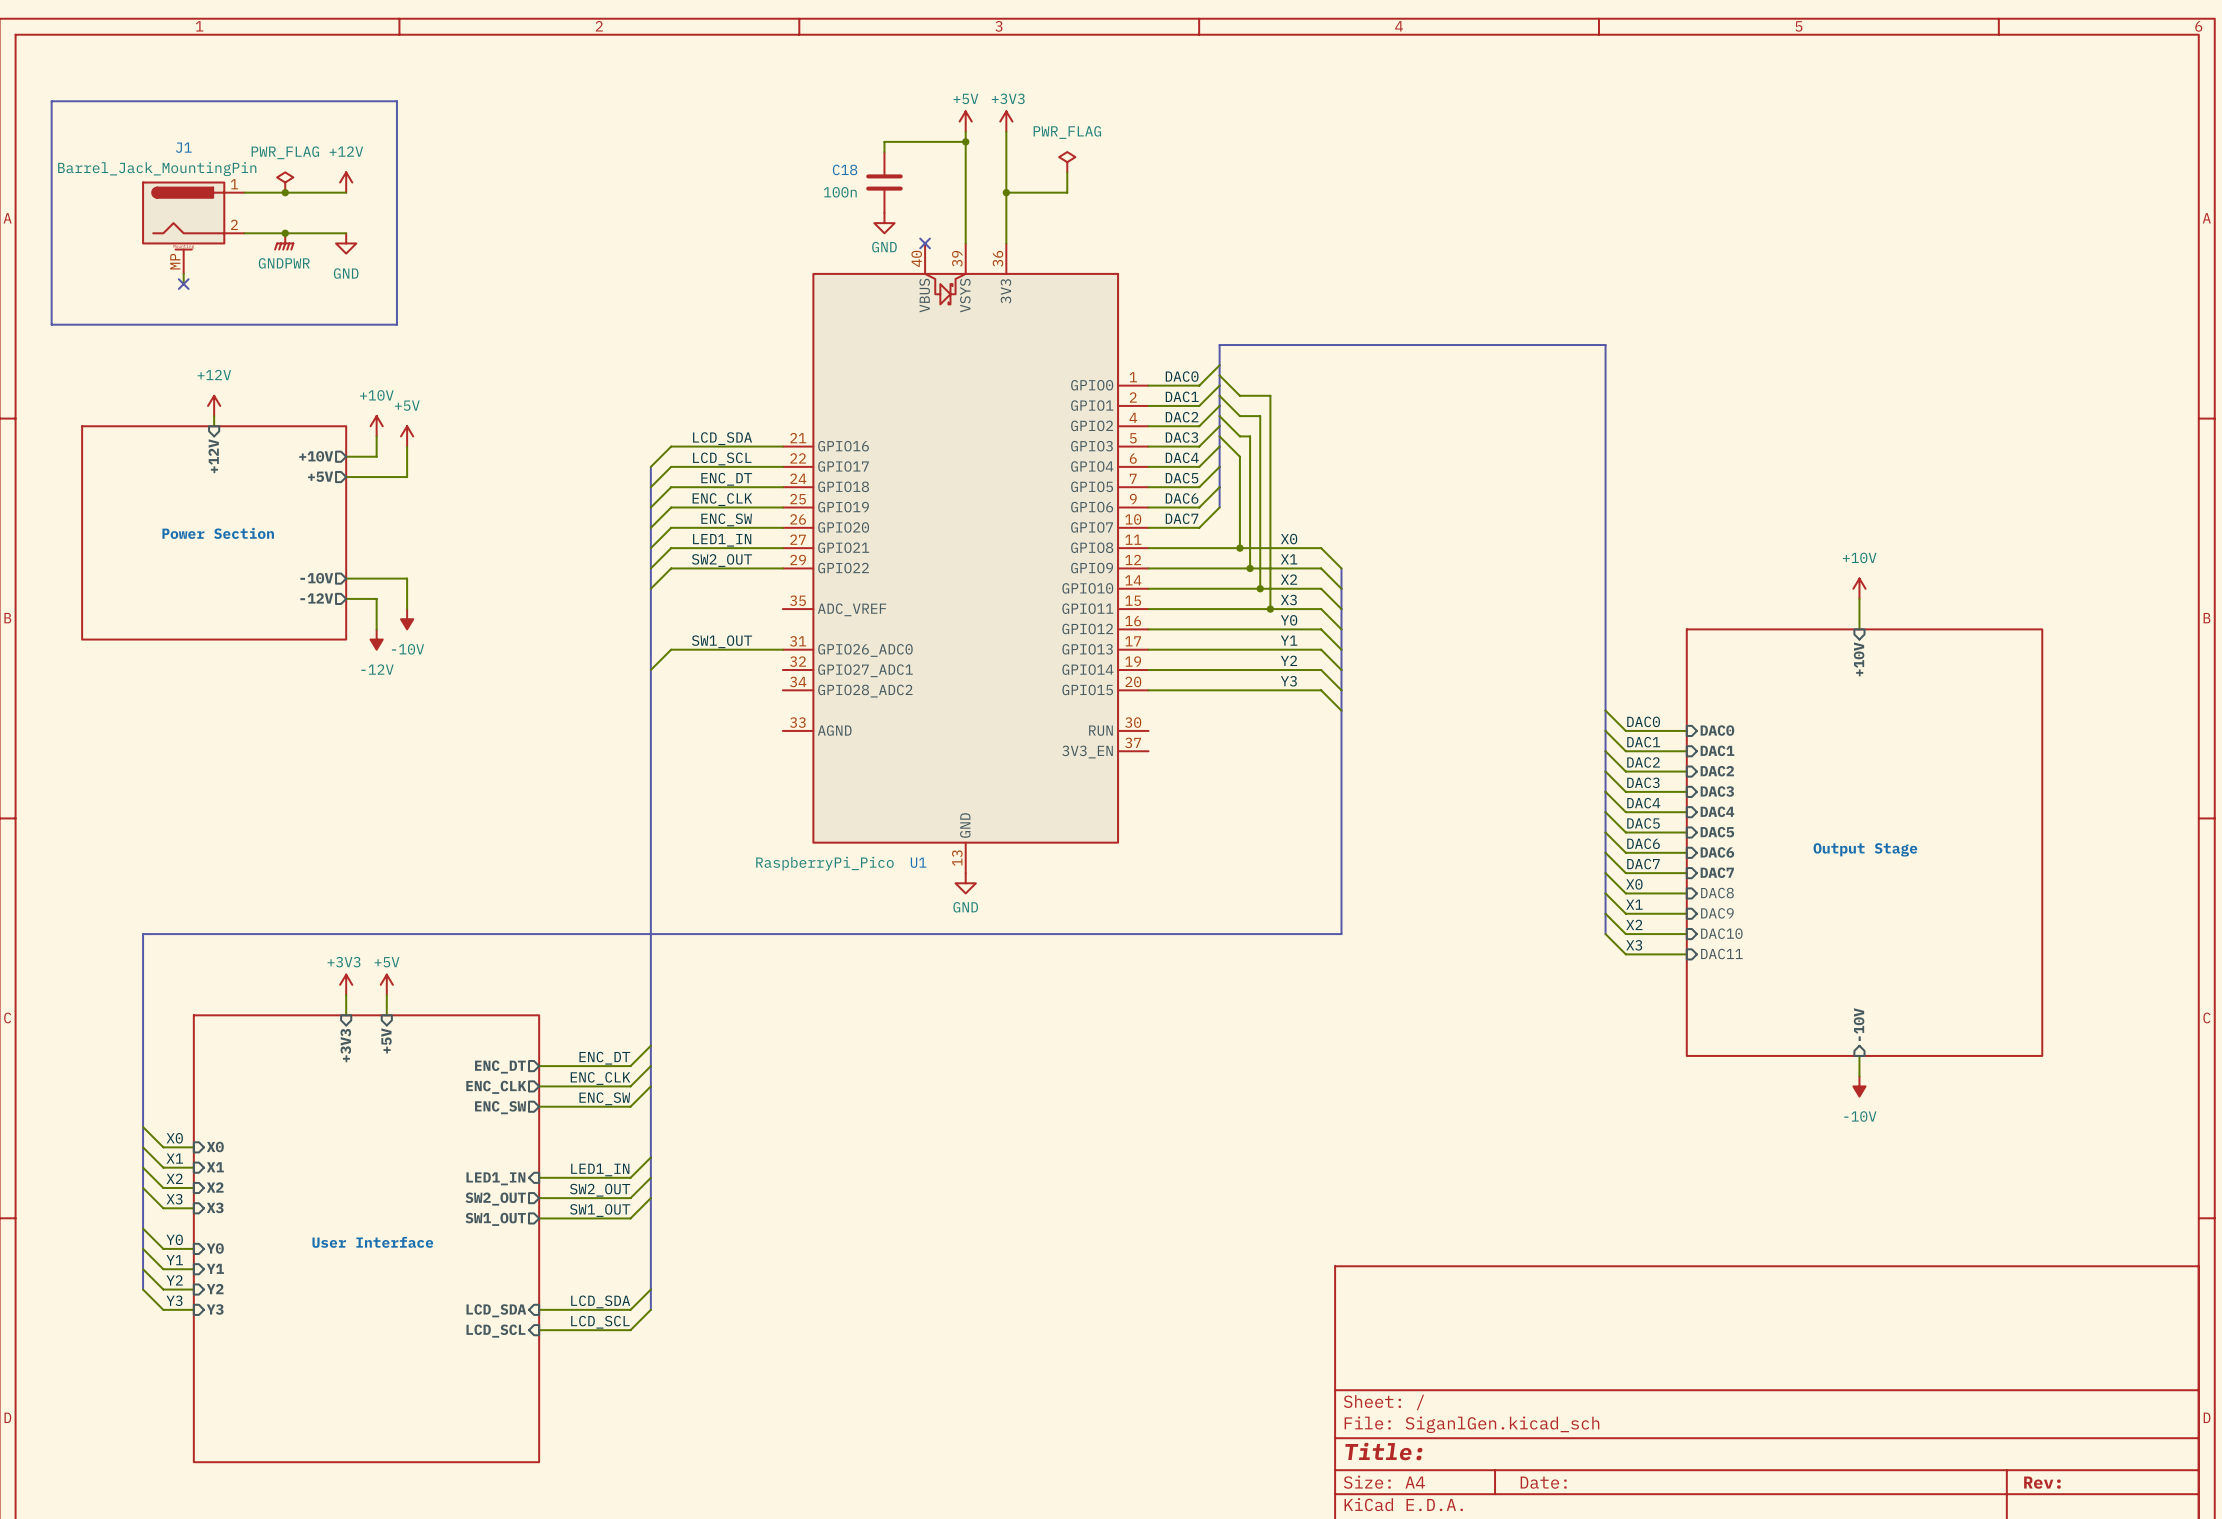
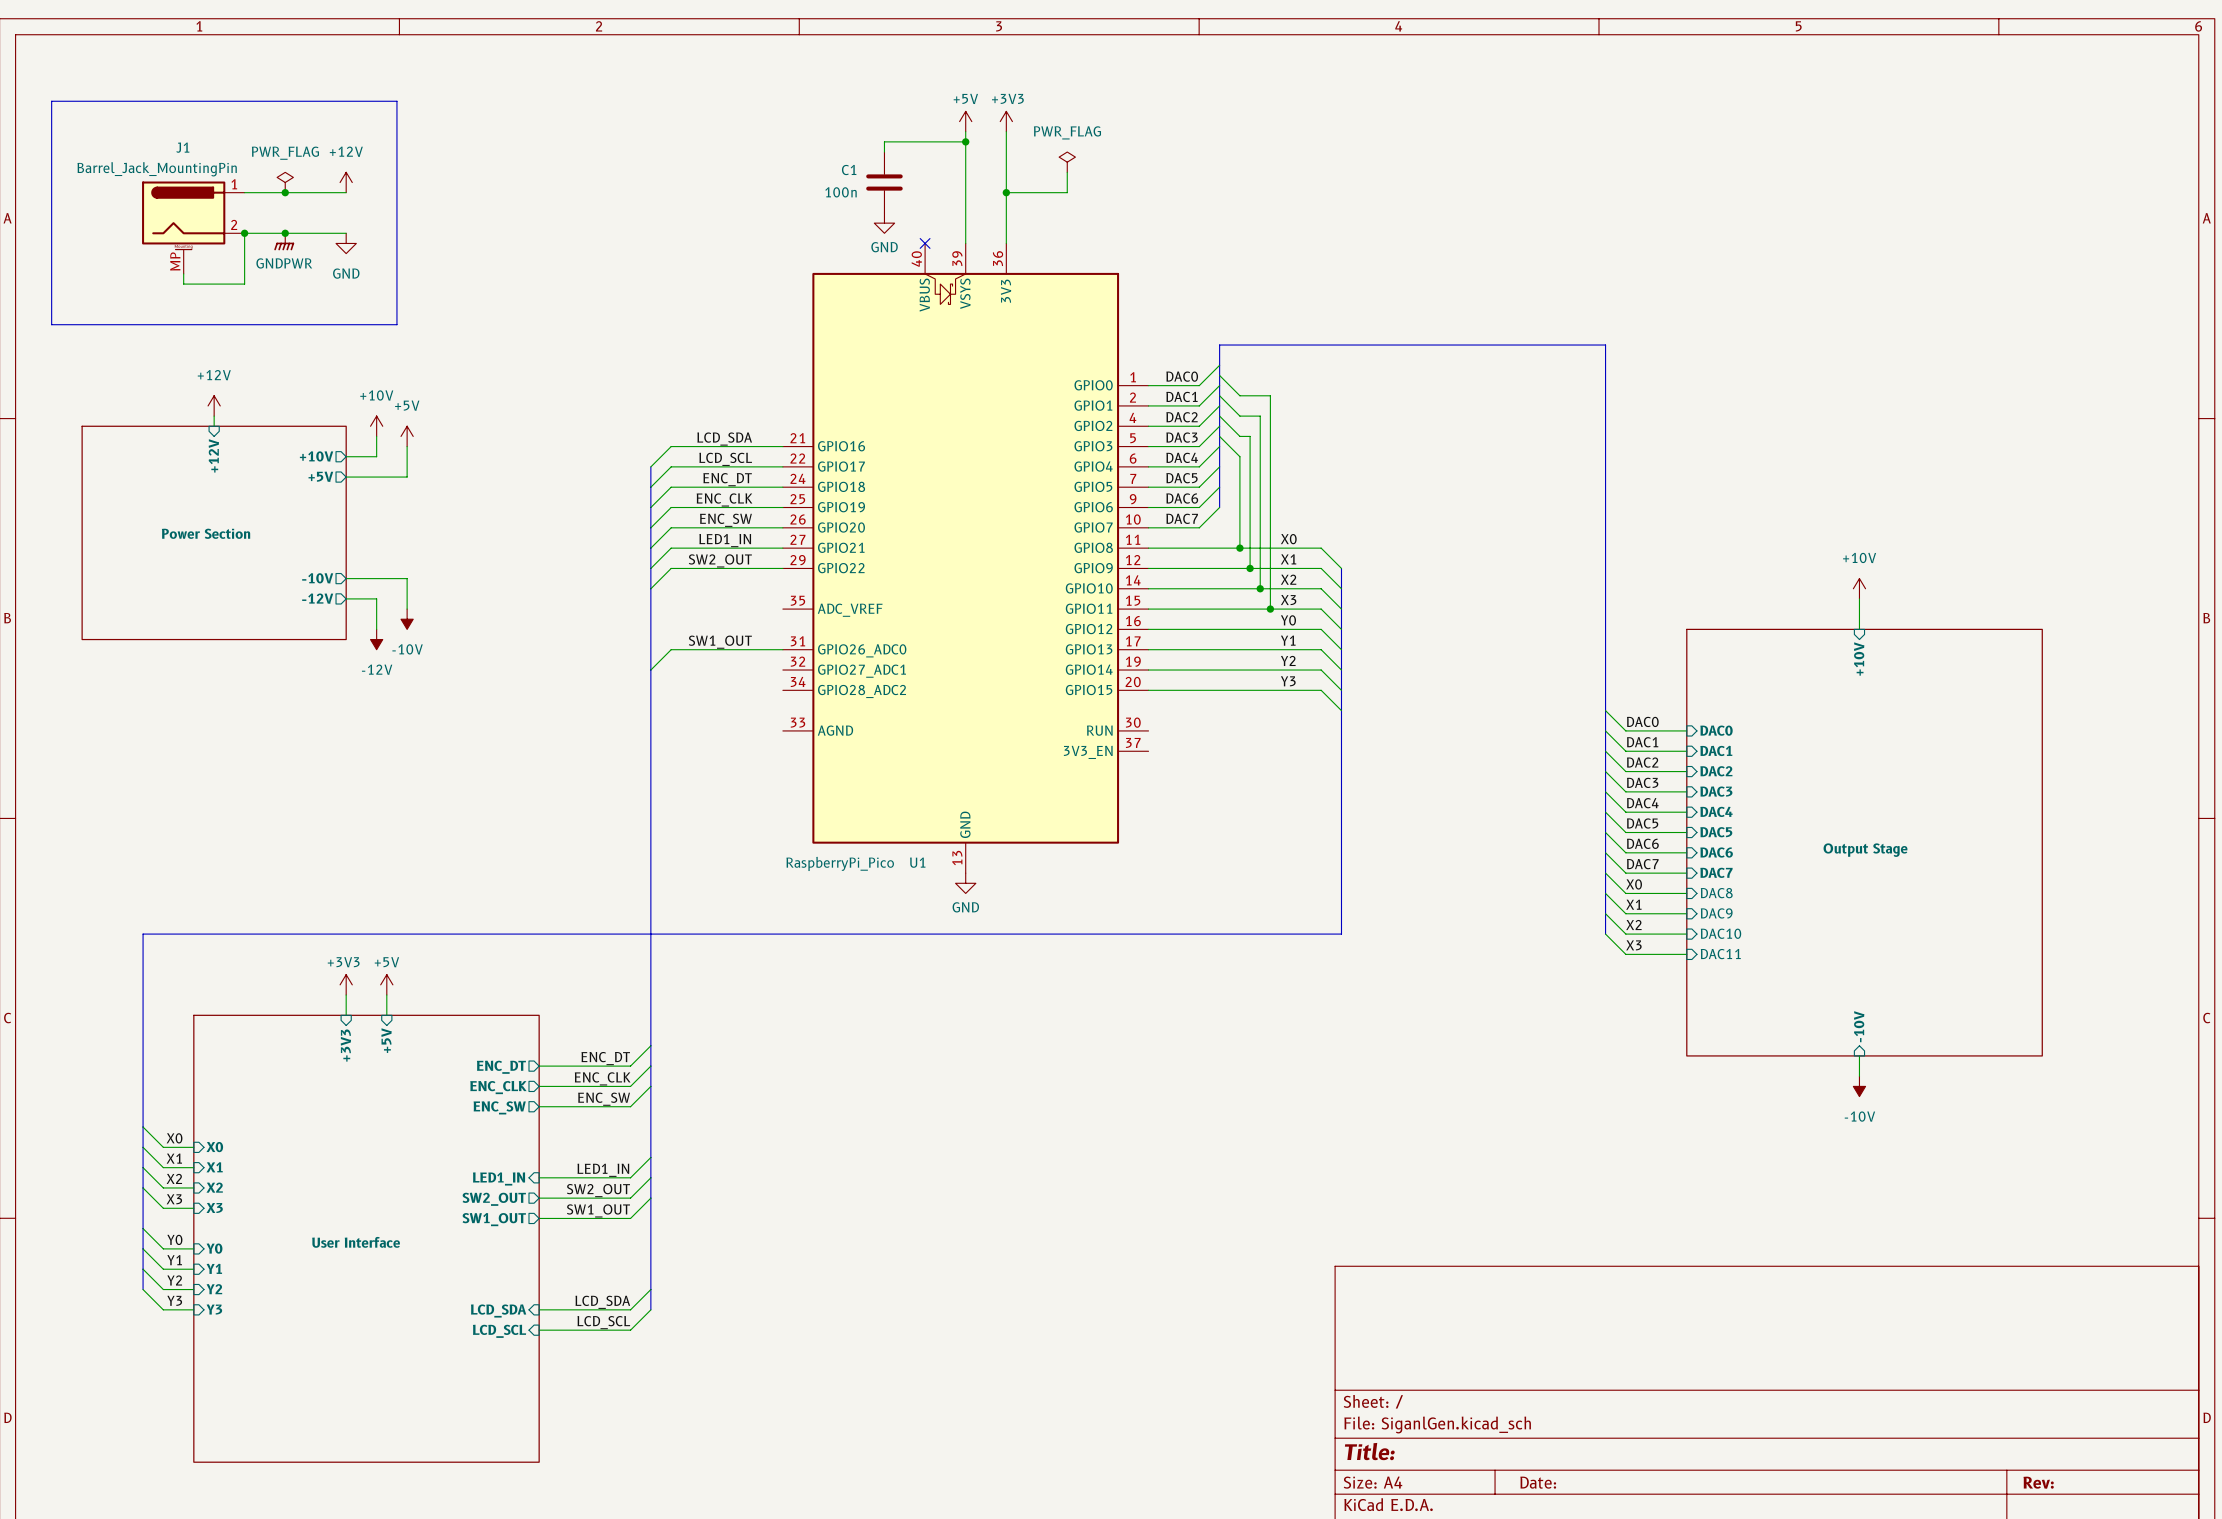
C18 name: C18 (845, 169) -> C1 (849, 170)
wire: none -> (244, 233) (244, 284) (183, 284)
junction: none -> (244, 233)
no-connect mark: (183, 284) -> none

